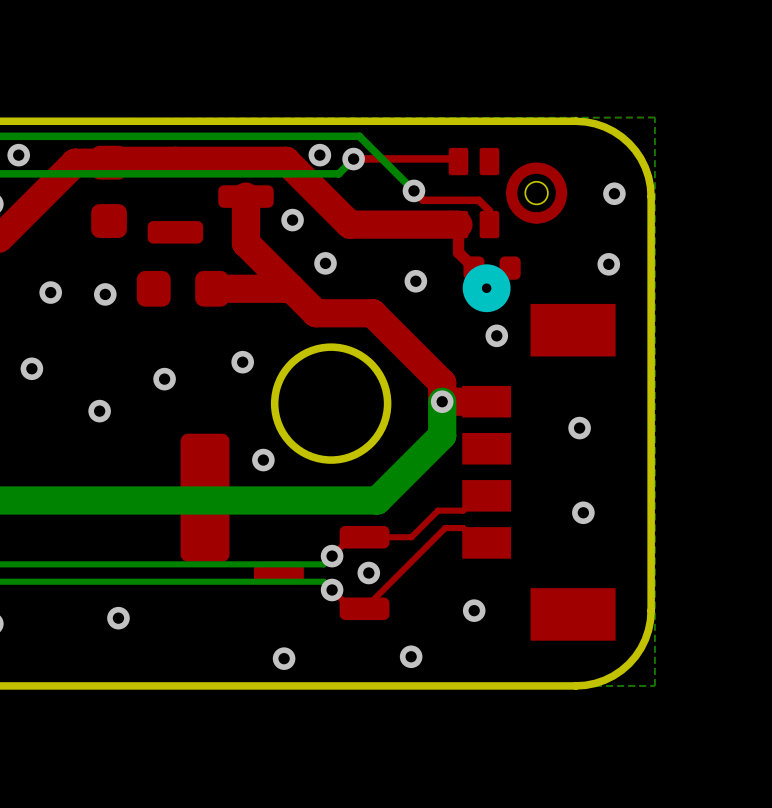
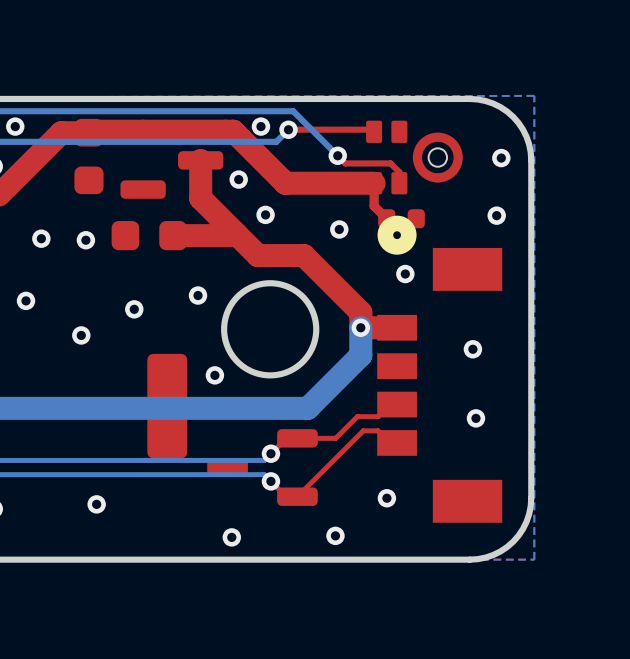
via: (368, 573) -> none

